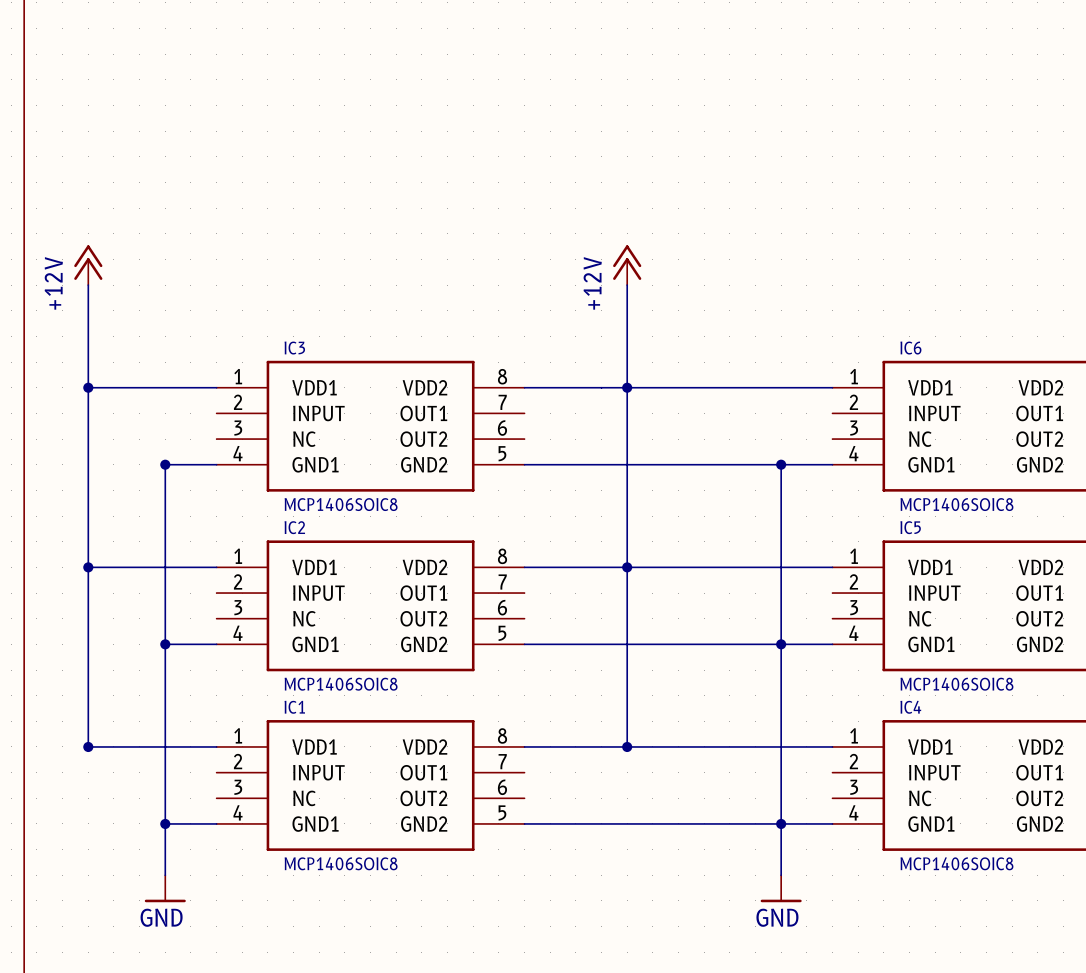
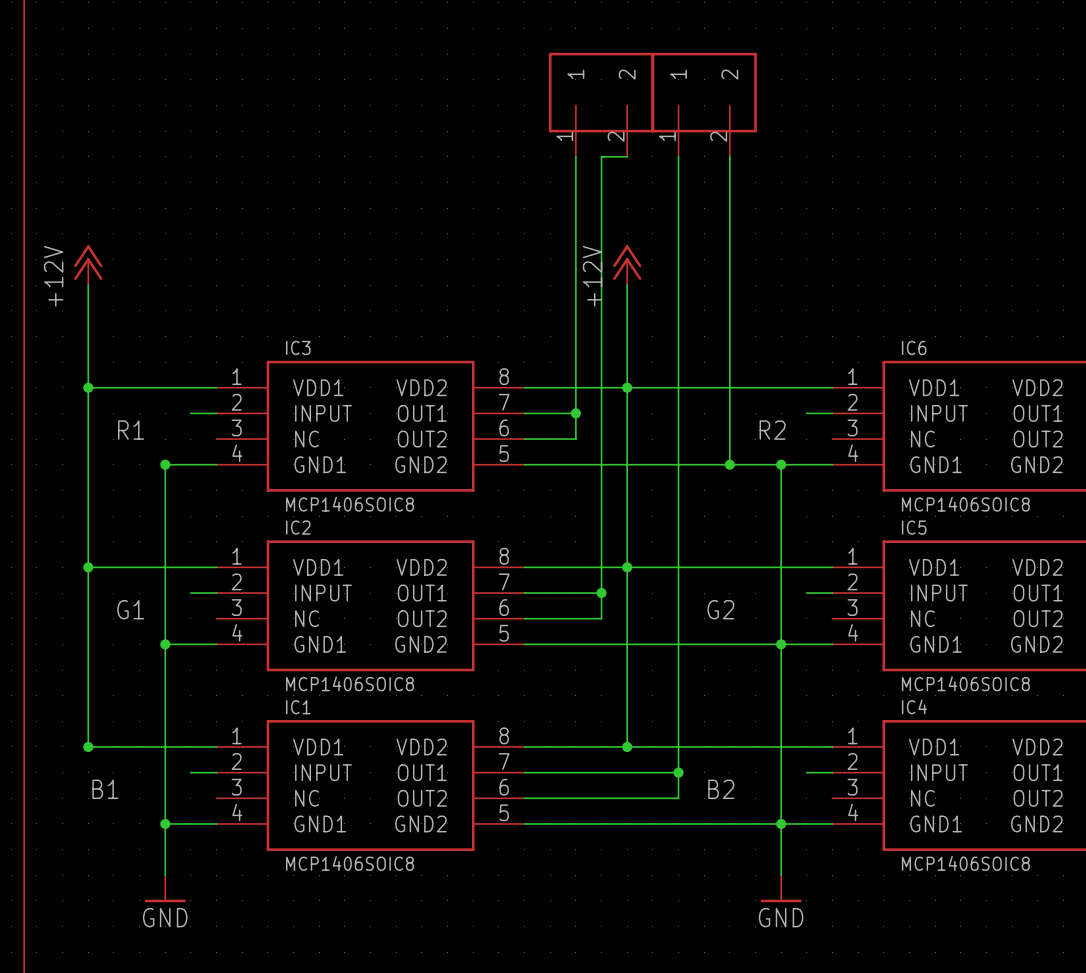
part: none -> (601, 104)
part: none -> (704, 104)
wire: none -> (575, 156) (575, 439) (524, 439)
wire: none -> (627, 156) (601, 156) (601, 618) (524, 618)
wire: none -> (678, 156) (678, 798) (524, 798)
wire: none -> (729, 156) (729, 464)
wire: none -> (190, 413) (216, 413)
wire: none -> (524, 413) (575, 413)
junction: none -> (575, 413)
wire: none -> (806, 413) (832, 413)
label: none -> R1 (131, 430)
label: none -> R2 (772, 430)
junction: none -> (729, 464)
wire: none -> (190, 593) (216, 593)
wire: none -> (524, 593) (601, 593)
junction: none -> (601, 593)
wire: none -> (806, 593) (832, 593)
label: none -> G1 (130, 609)
label: none -> G2 (720, 609)
wire: none -> (190, 772) (216, 772)
wire: none -> (524, 772) (678, 772)
junction: none -> (678, 772)
wire: none -> (806, 772) (832, 772)
label: none -> B1 (105, 789)
label: none -> B2 (721, 789)

